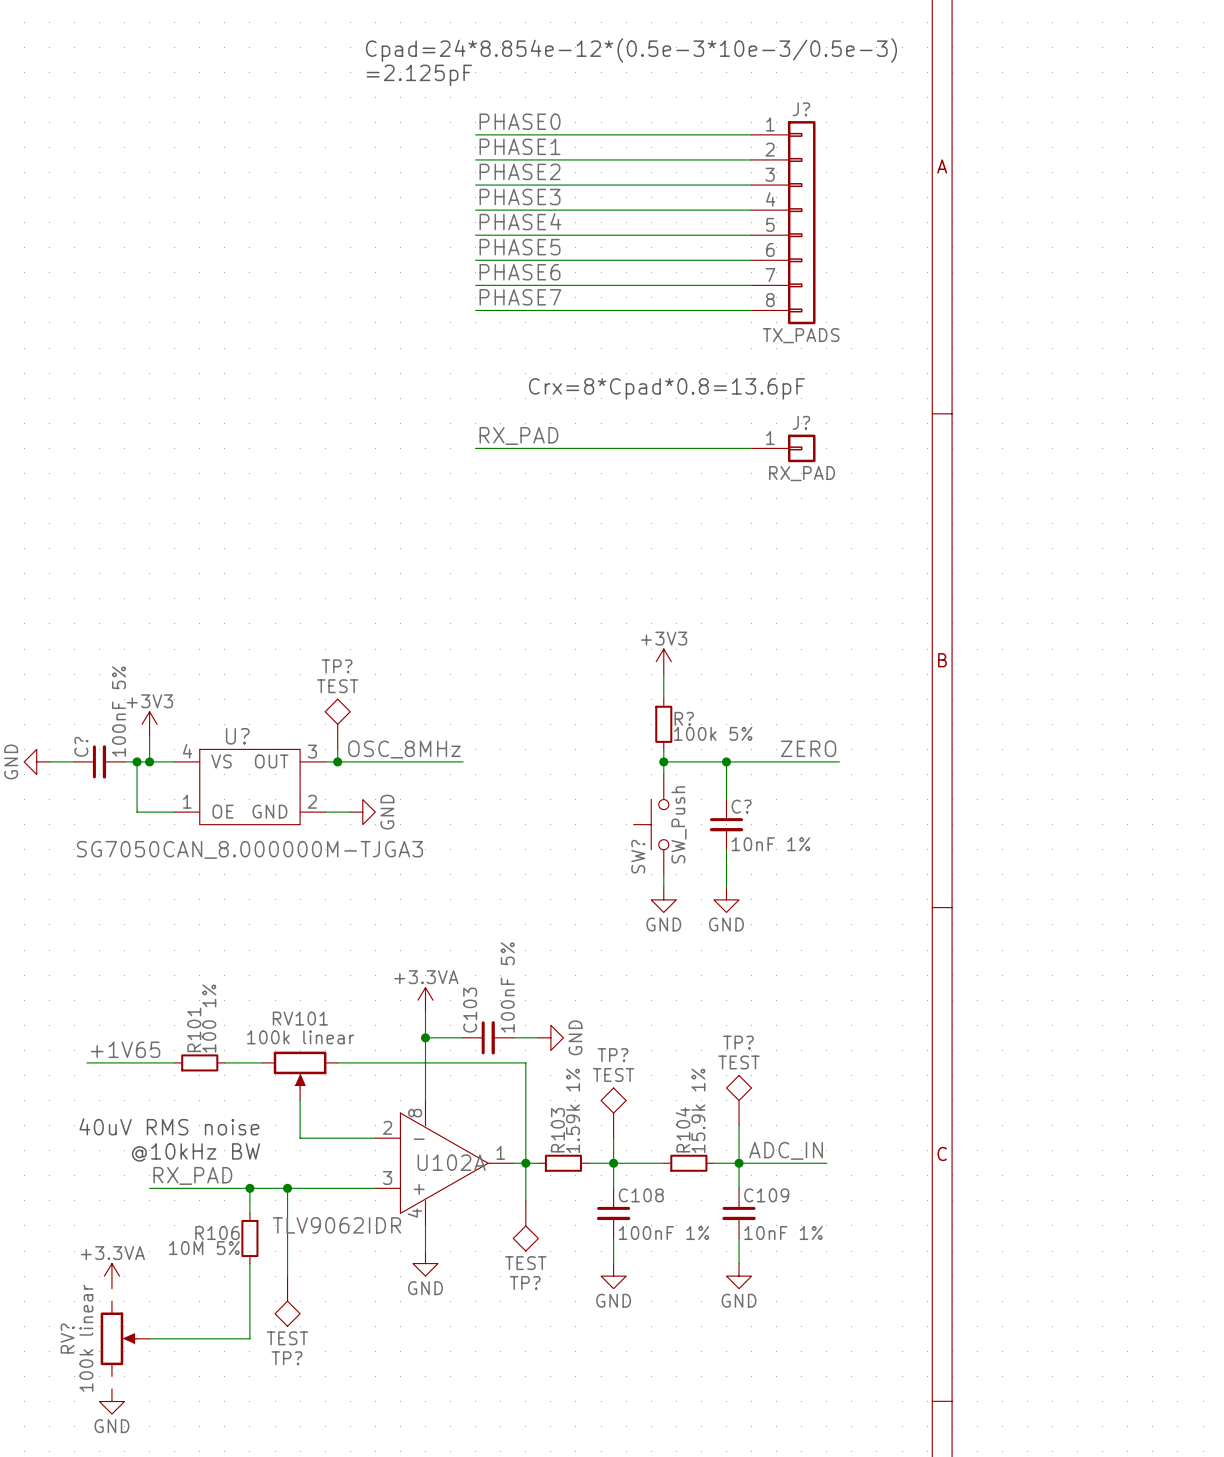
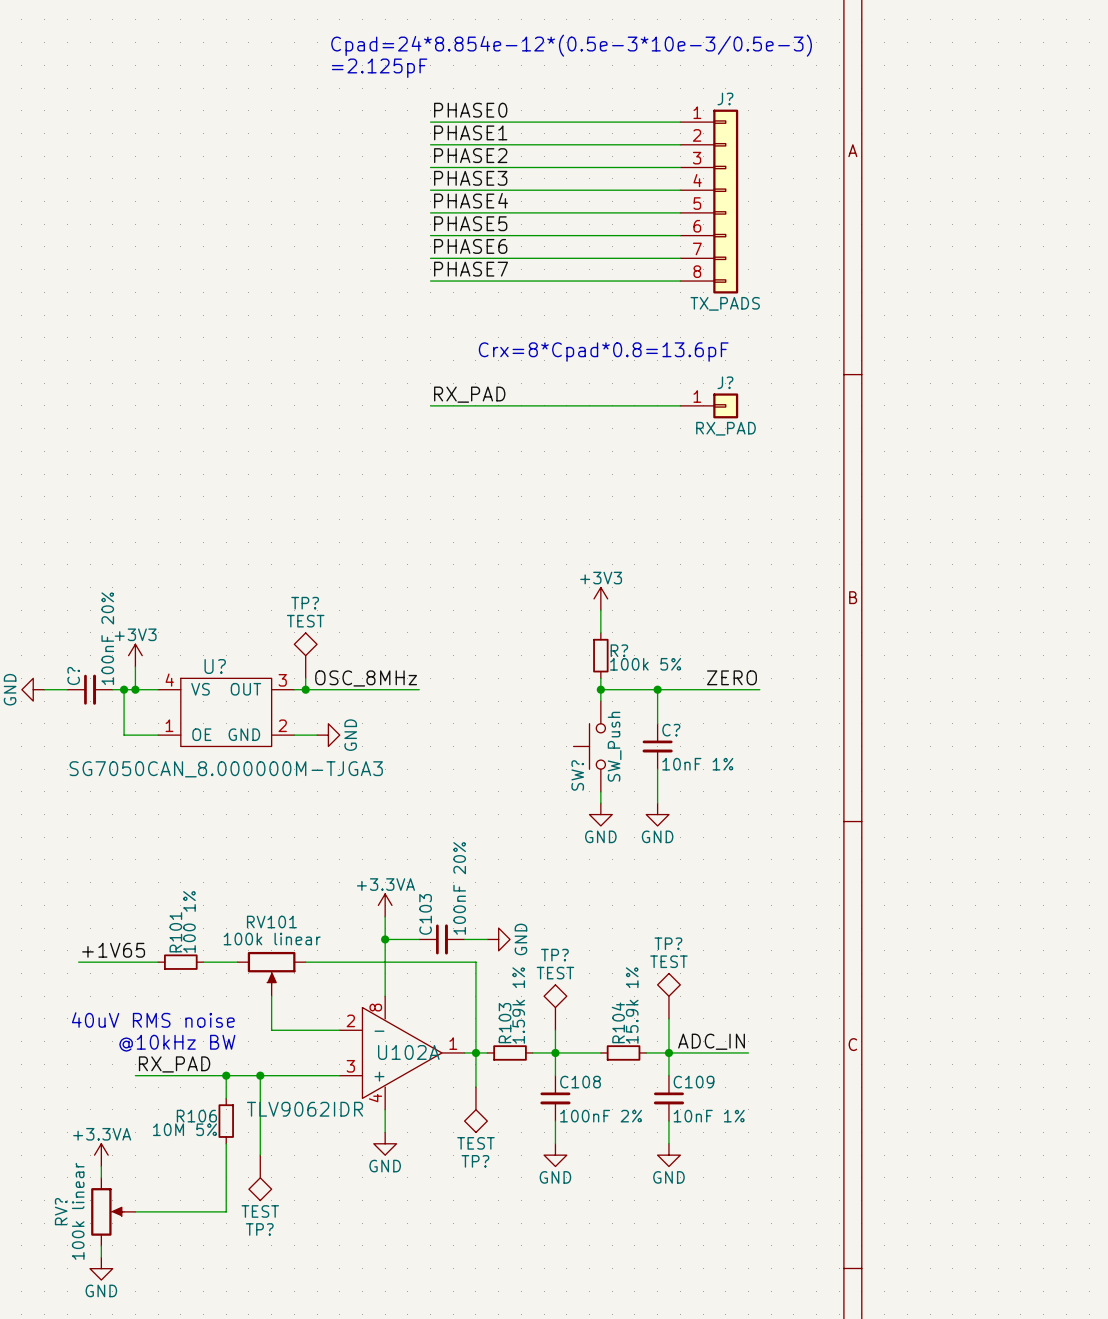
C? value: 100nF 5% (119, 711) -> 100nF 20% (107, 638)
C103 value: 100nF 5% (507, 987) -> 100nF 20% (459, 888)
C108 value: 100nF 1% (663, 1233) -> 100nF 2% (601, 1116)
wire: none -> (101, 1166) (101, 1177)
wire: none -> (101, 1245) (101, 1257)

